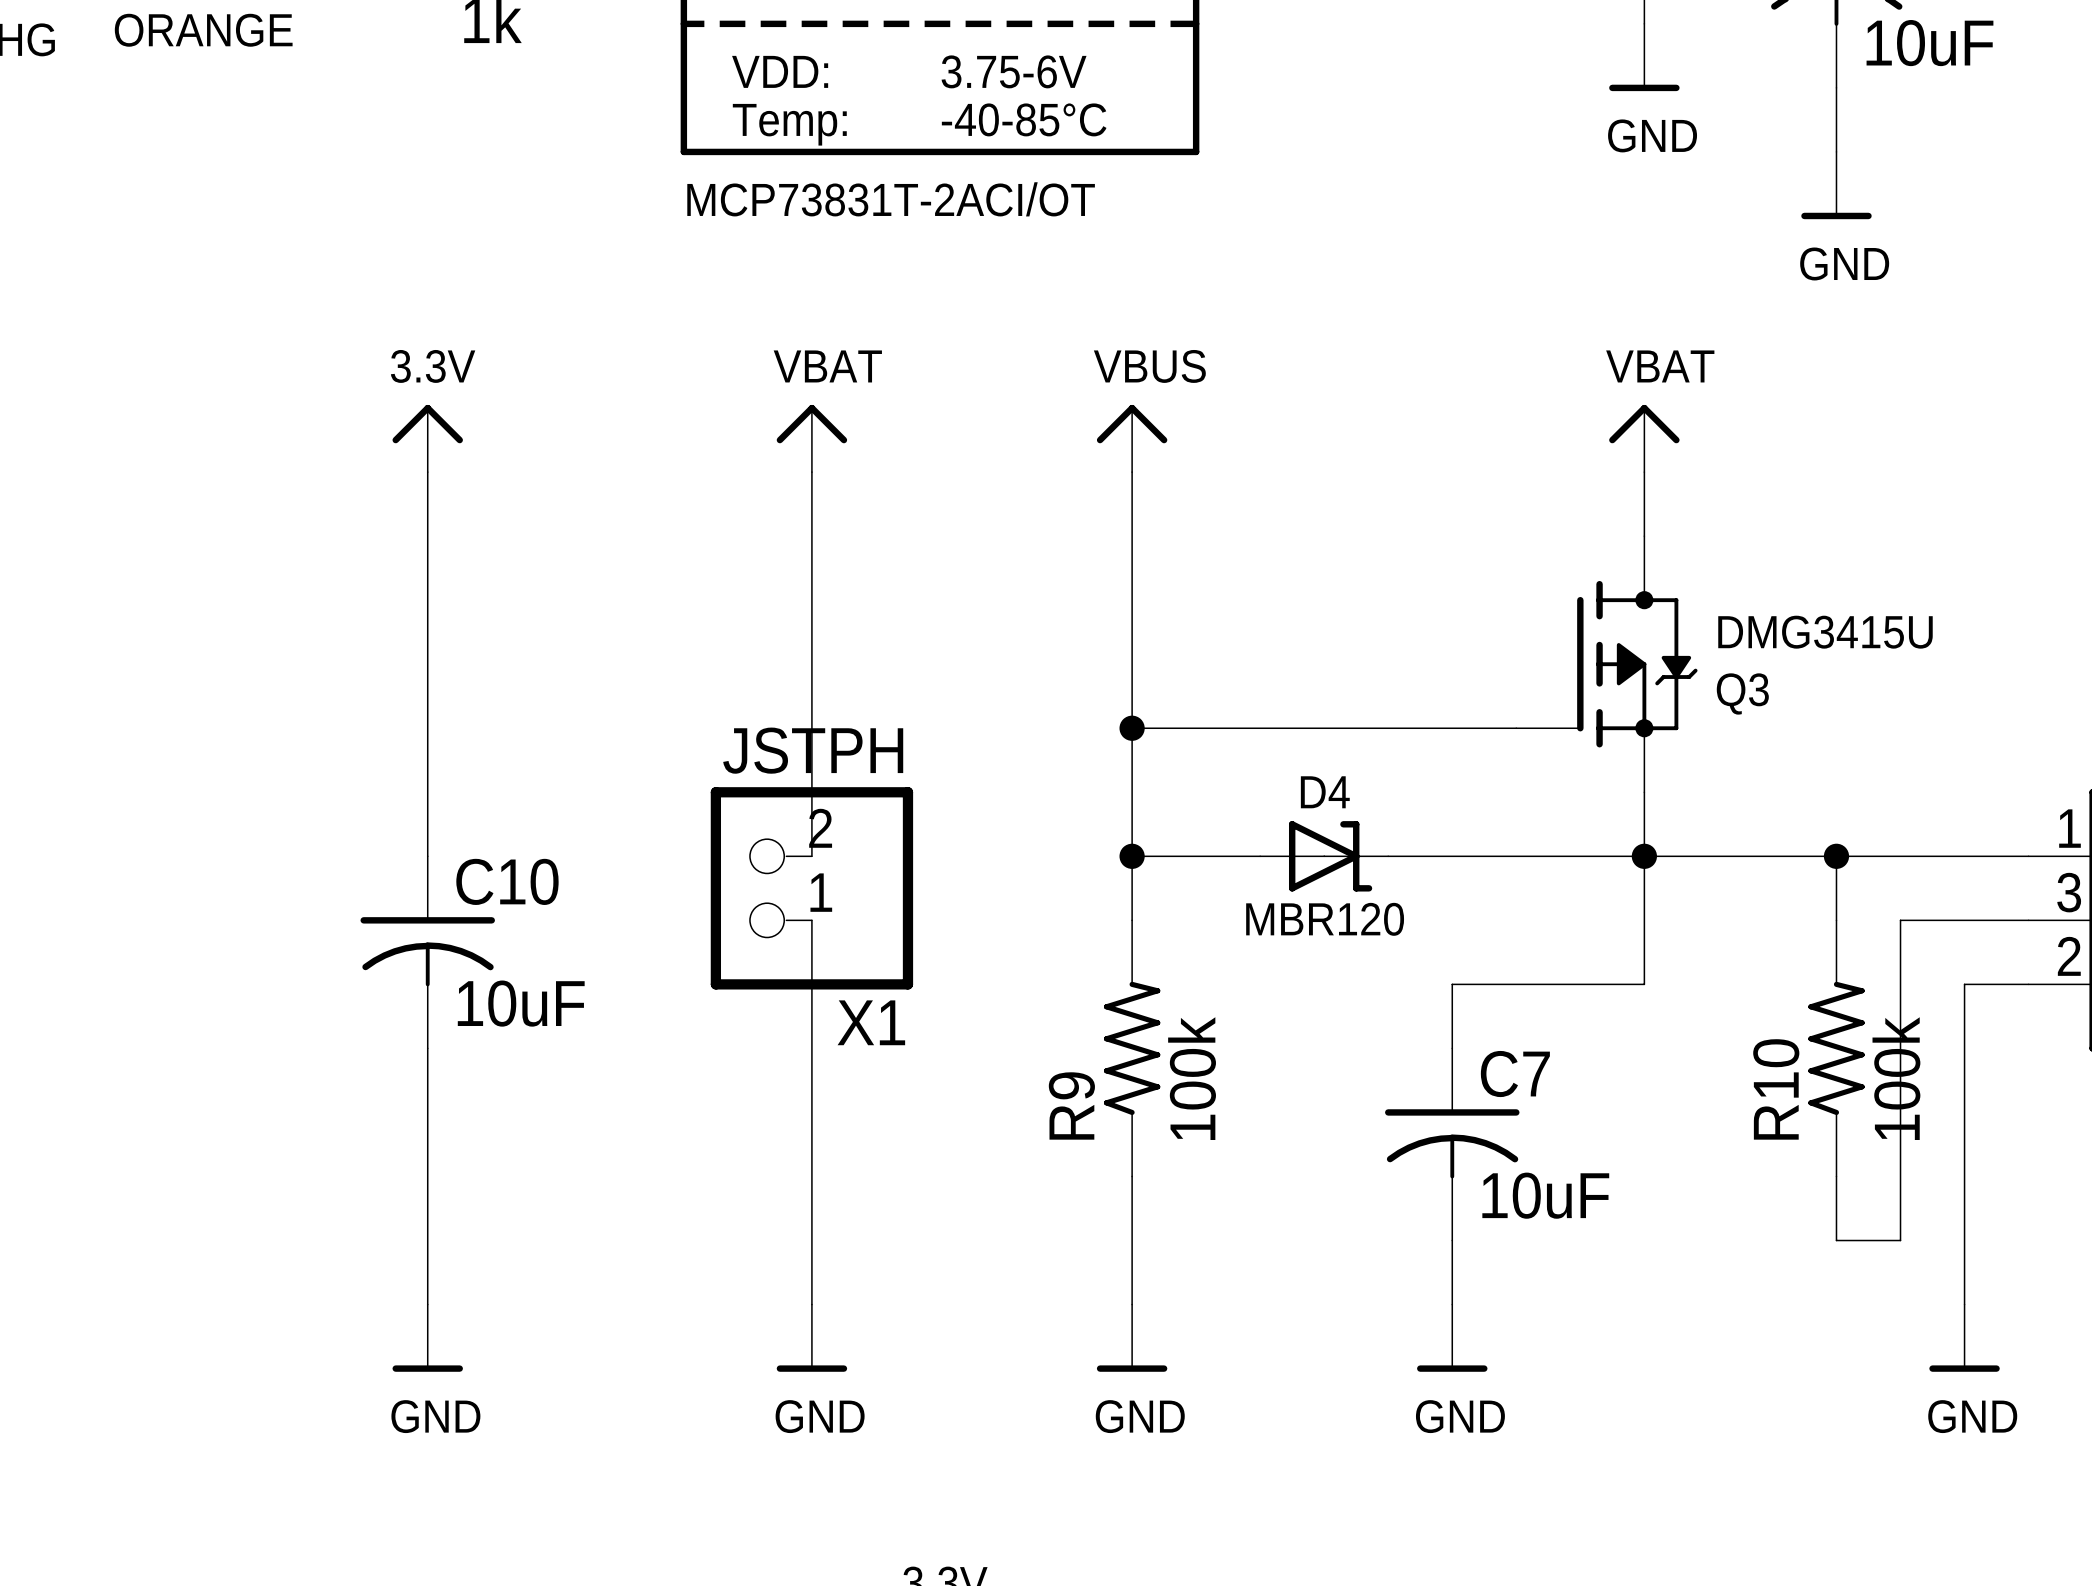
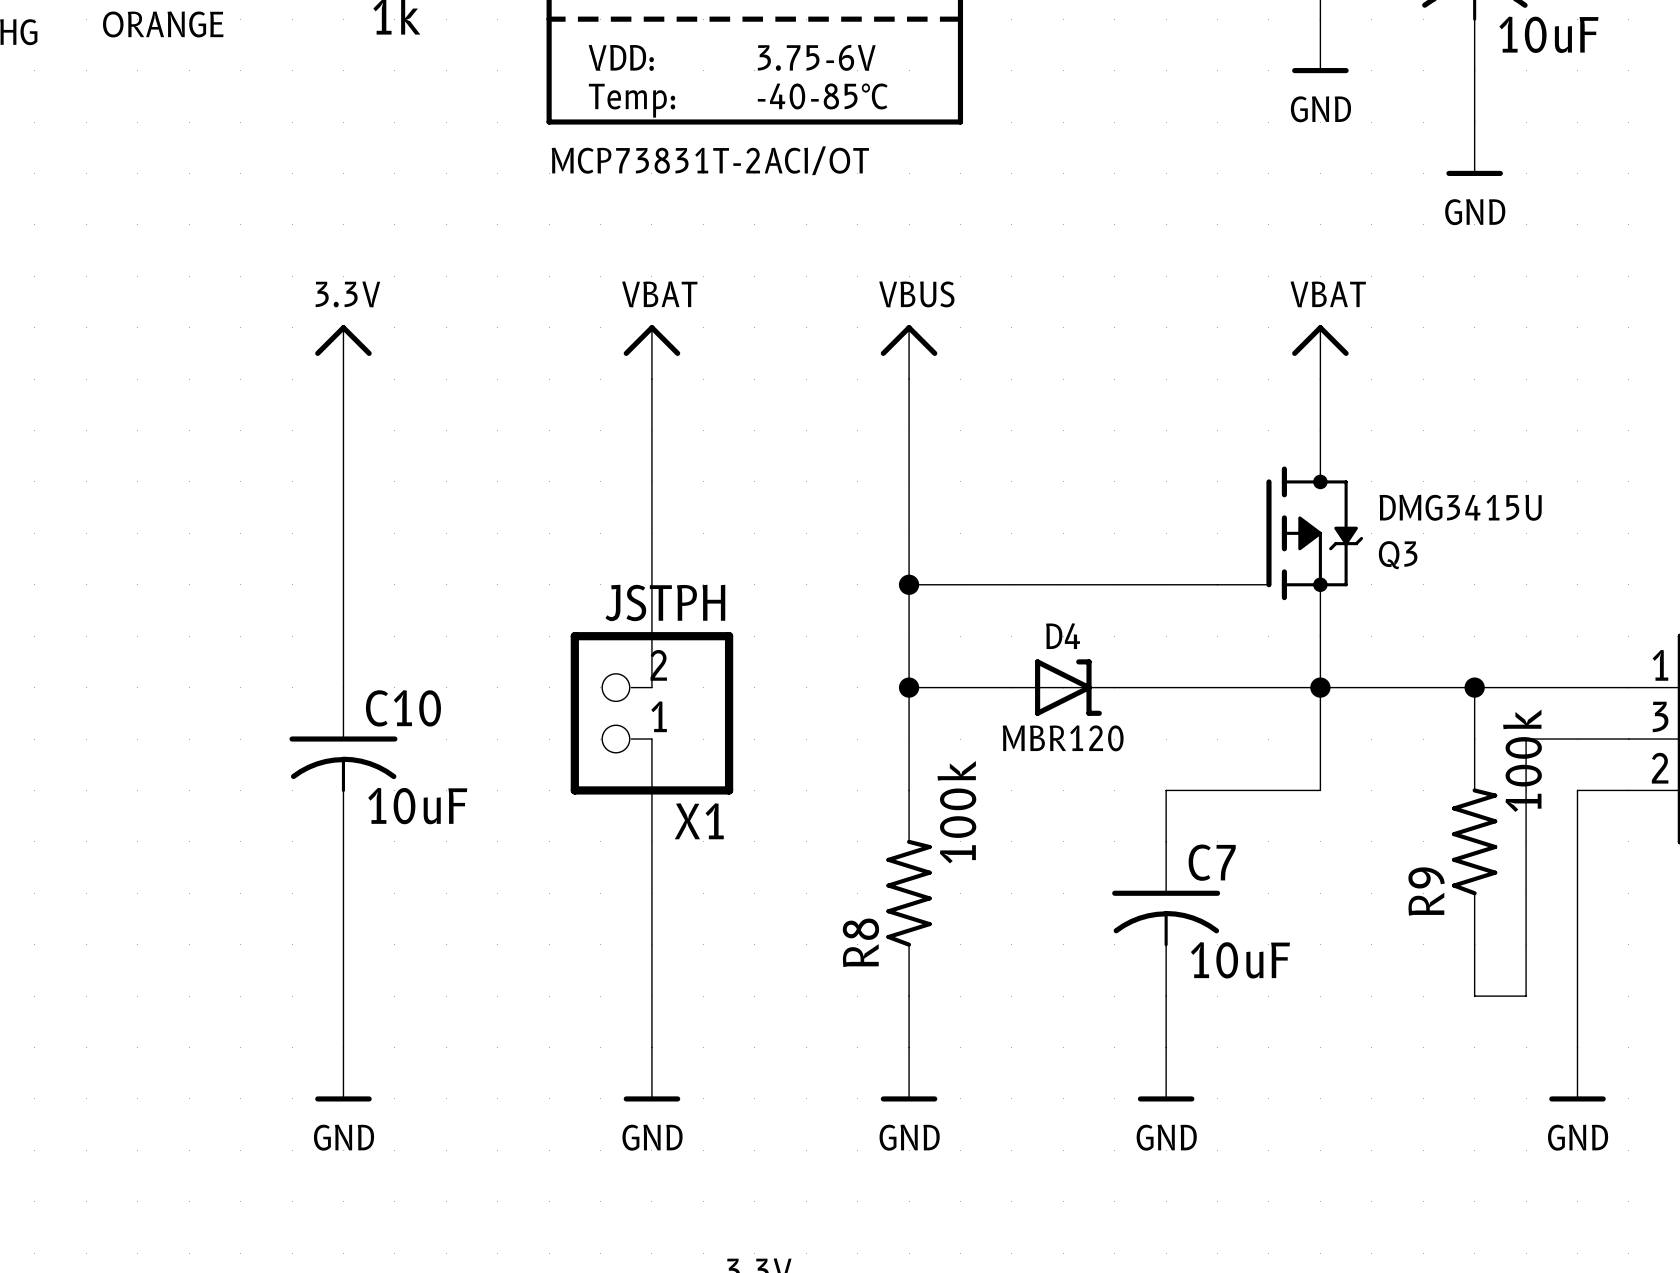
R9: 100k (1132, 1048) -> none
R10 value position: 100k (1896, 1078) -> 100k (1522, 760)
R10 name: R10 (1776, 1089) -> R9 (1426, 891)
R8: none -> 100k (909, 893)

